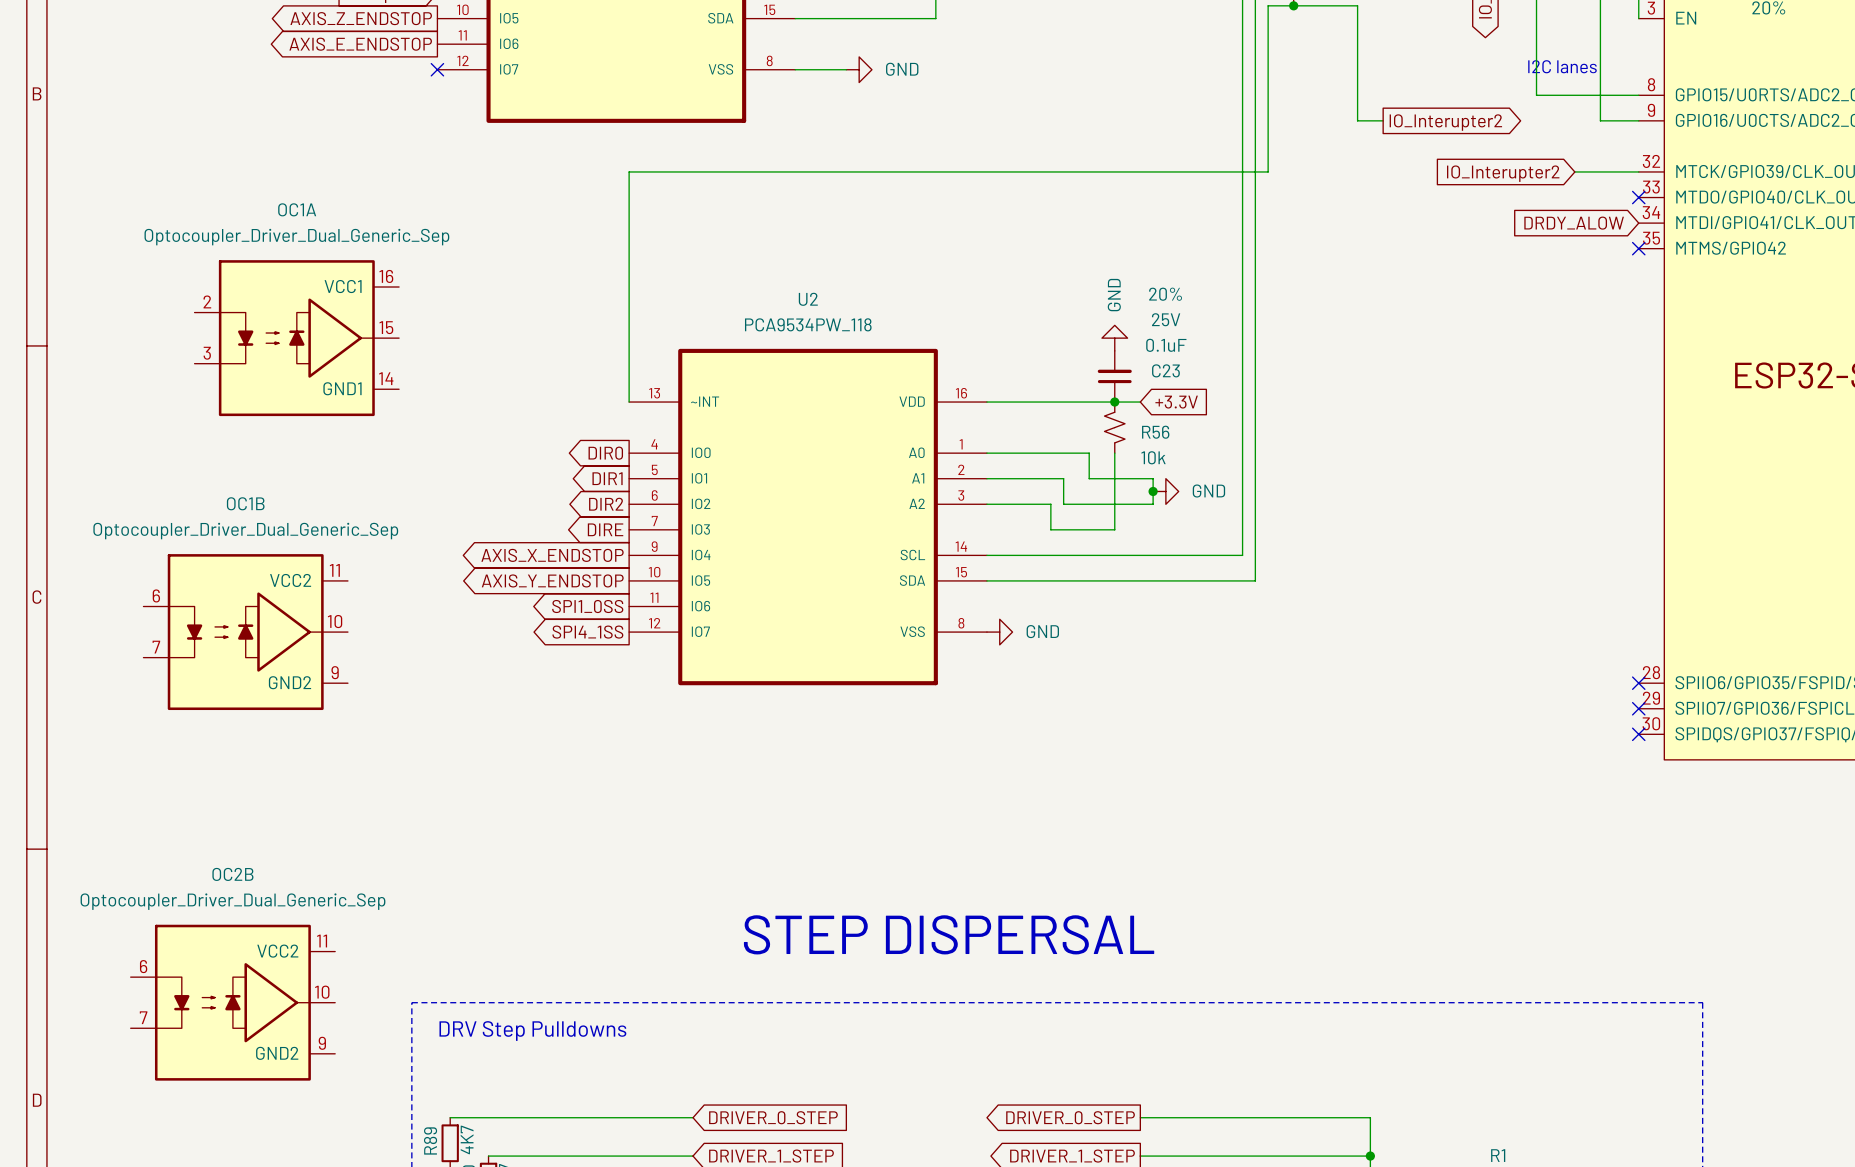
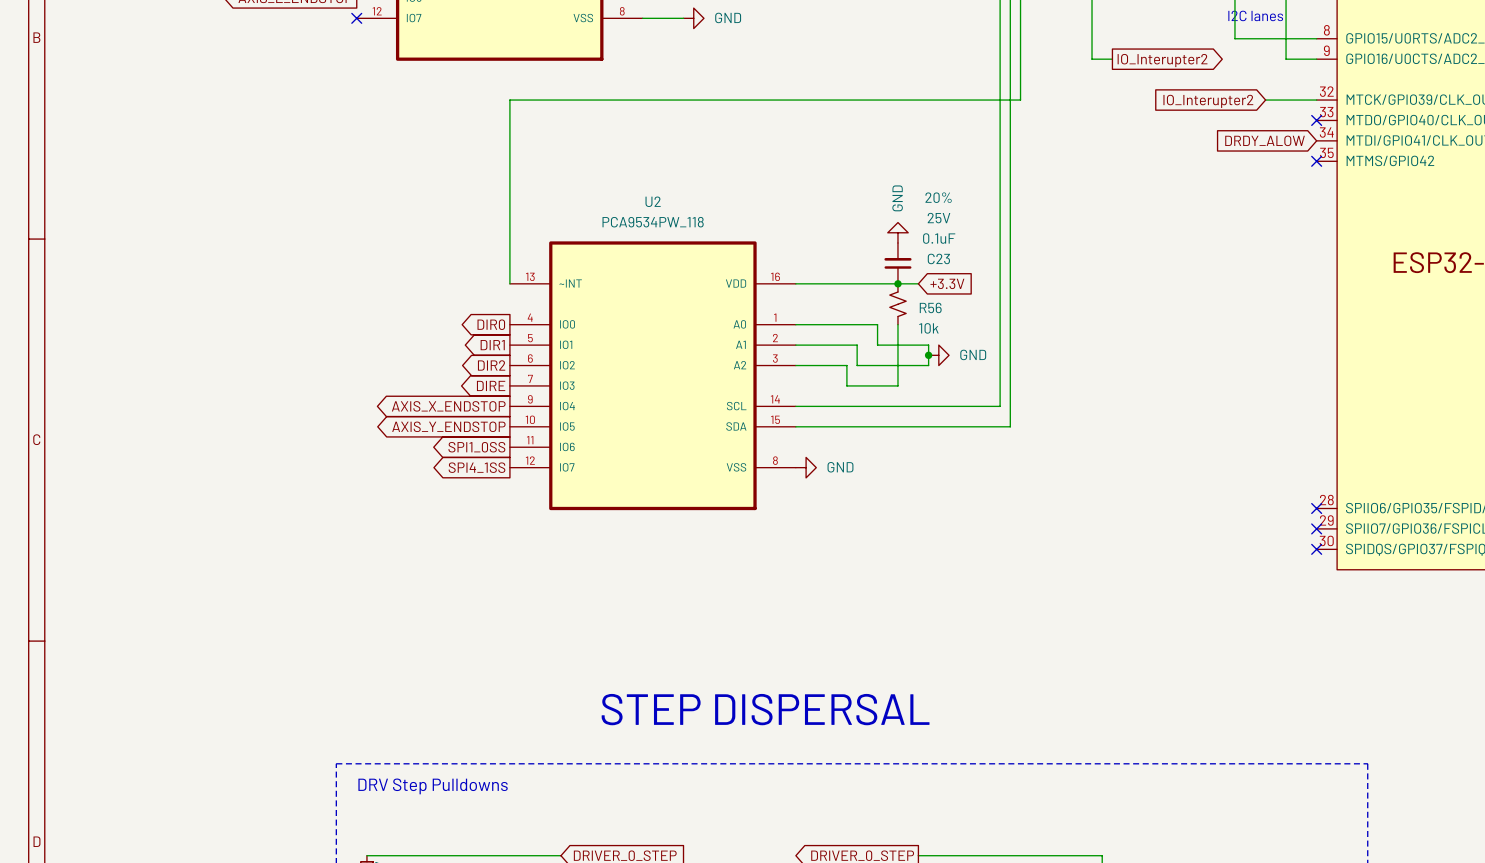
OC1A: Optocoupler_Driver_Dual_Generic_Sep (296, 338) -> none
OC1B: Optocoupler_Driver_Dual_Generic_Sep (245, 632) -> none
OC2B: Optocoupler_Driver_Dual_Generic_Sep (232, 1002) -> none

